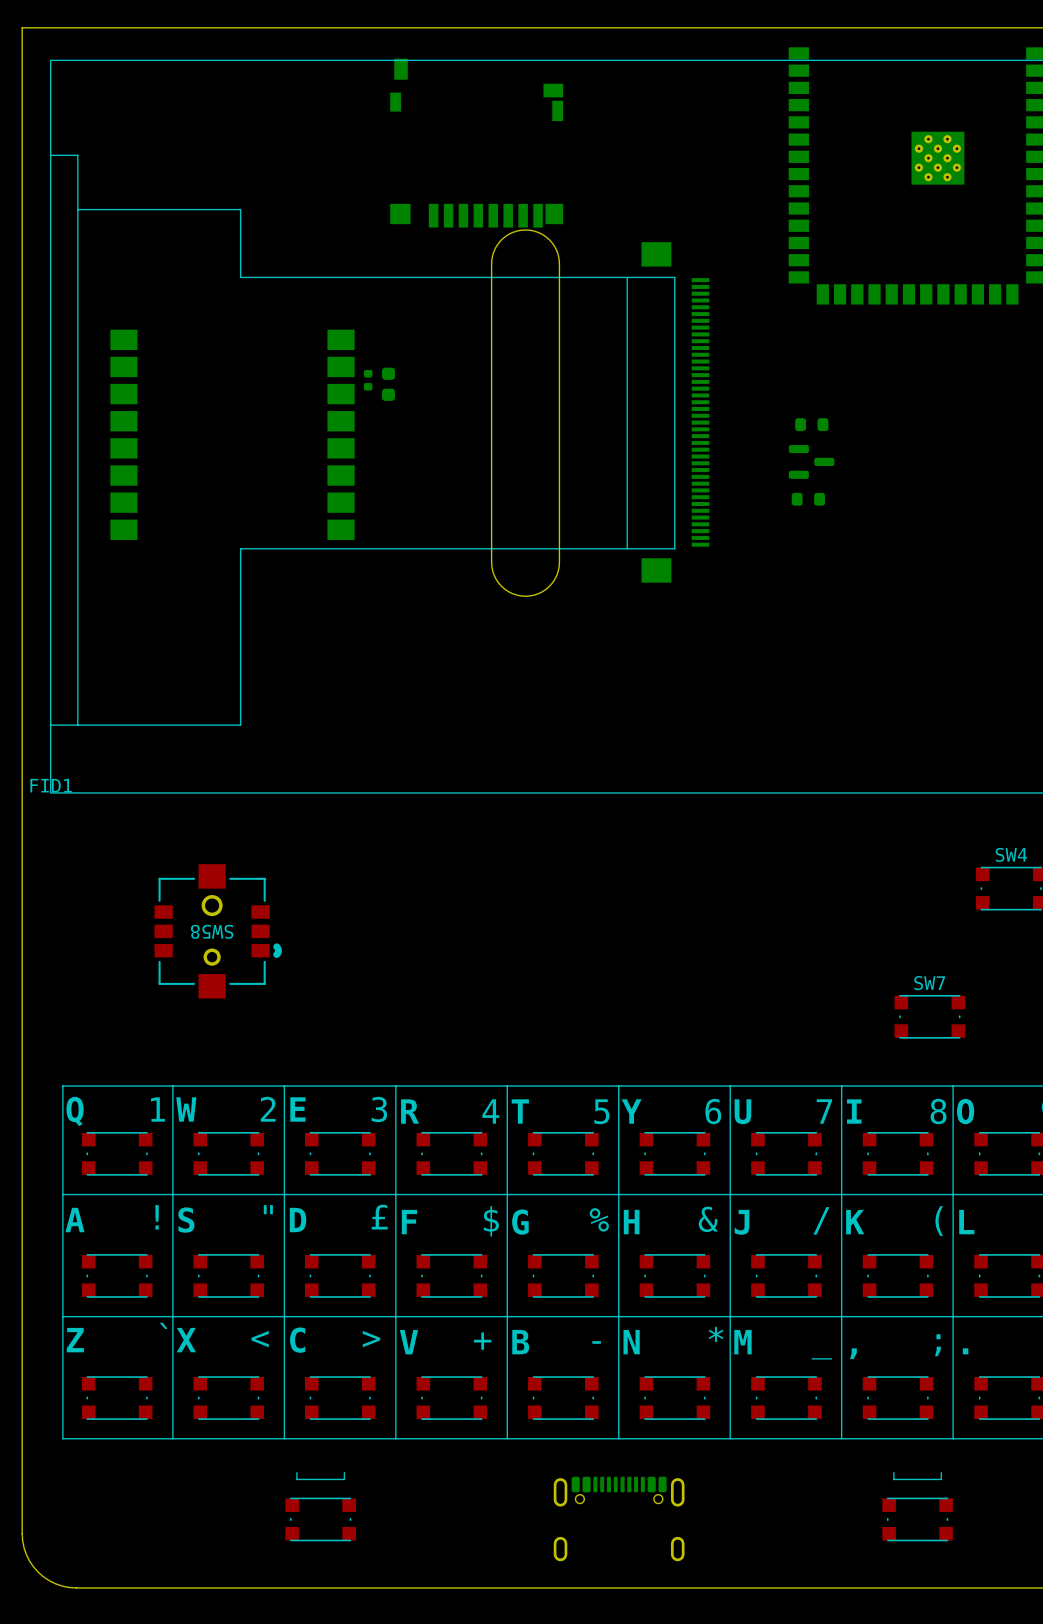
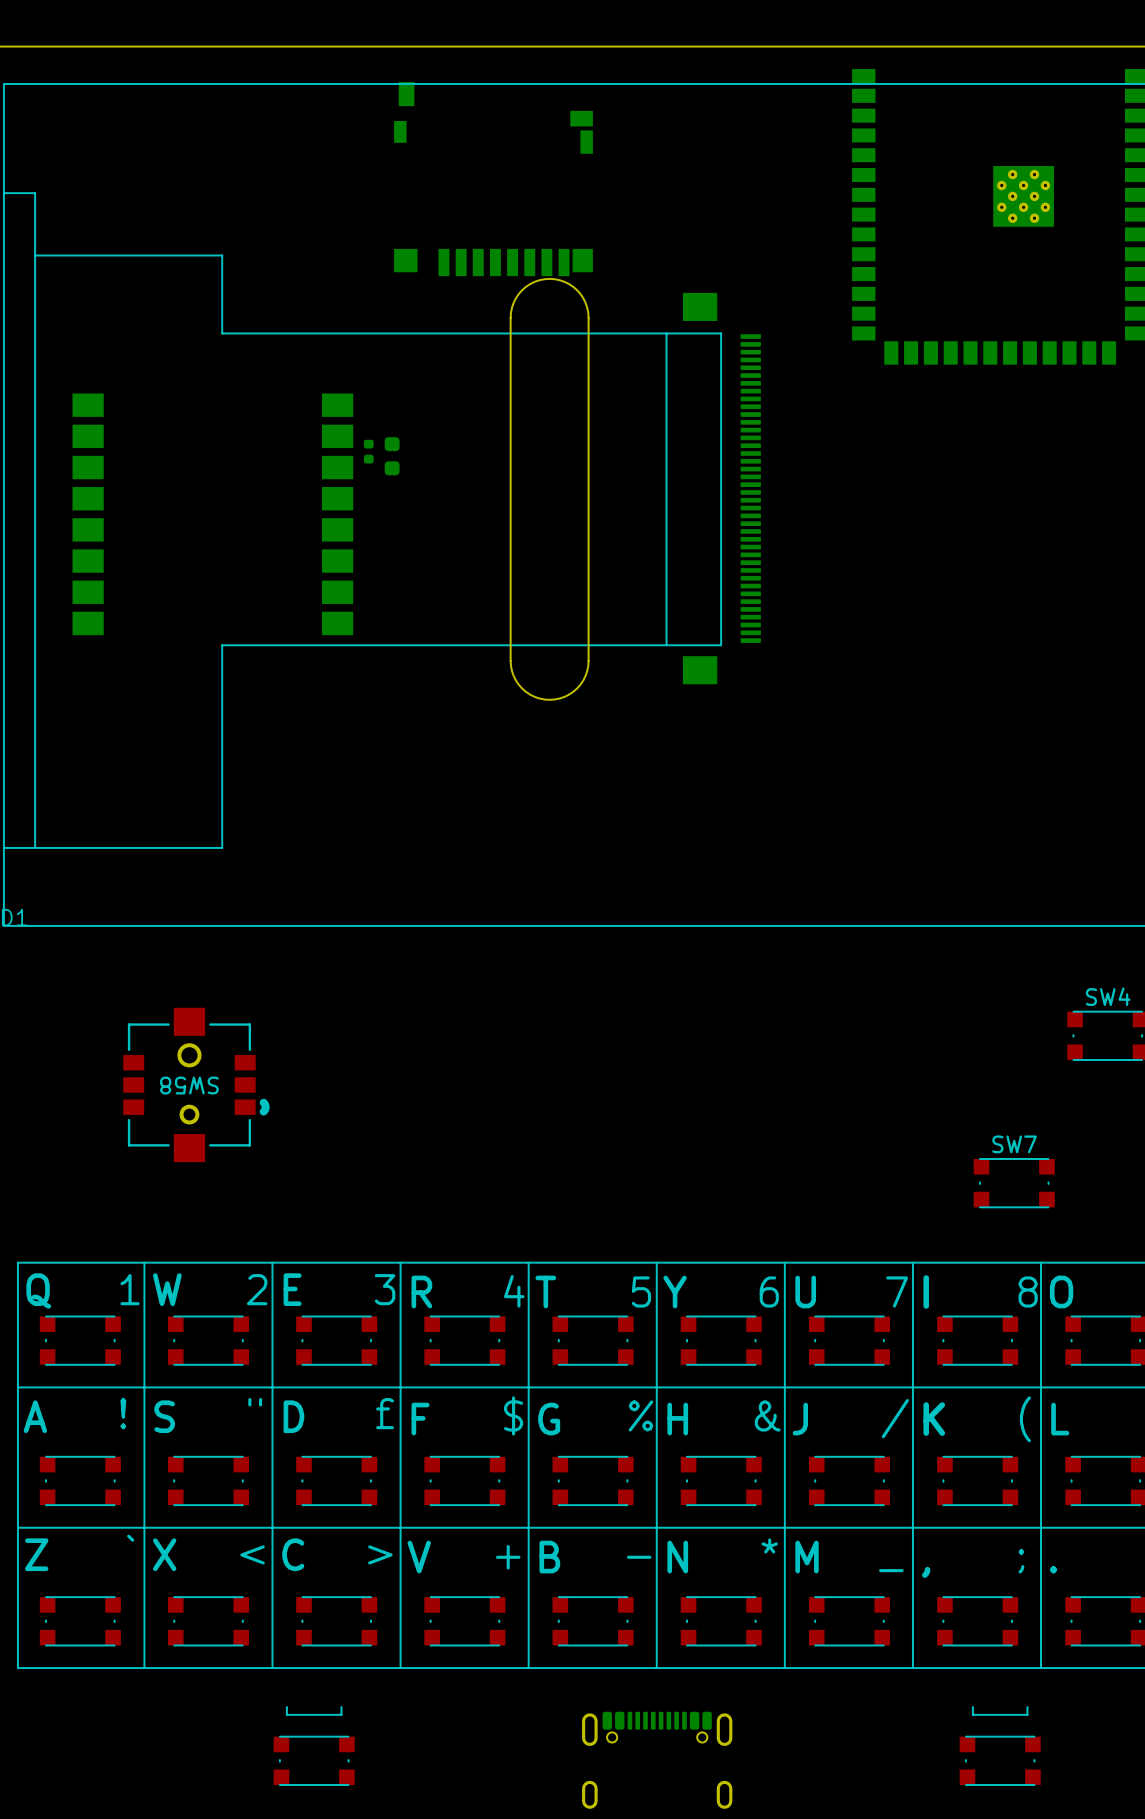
part: (811, 424) -> none
part: (811, 461) -> none
part: (808, 499) -> none

